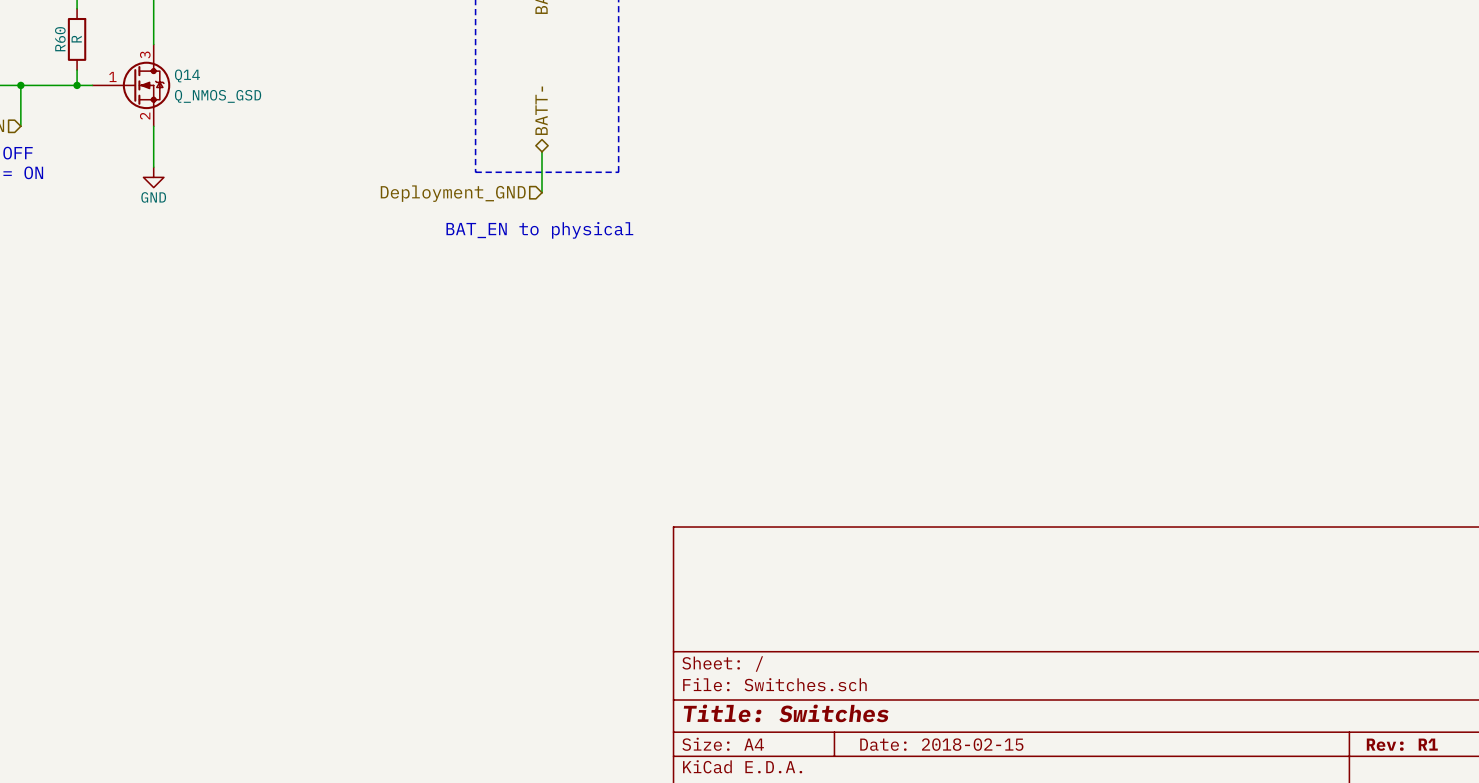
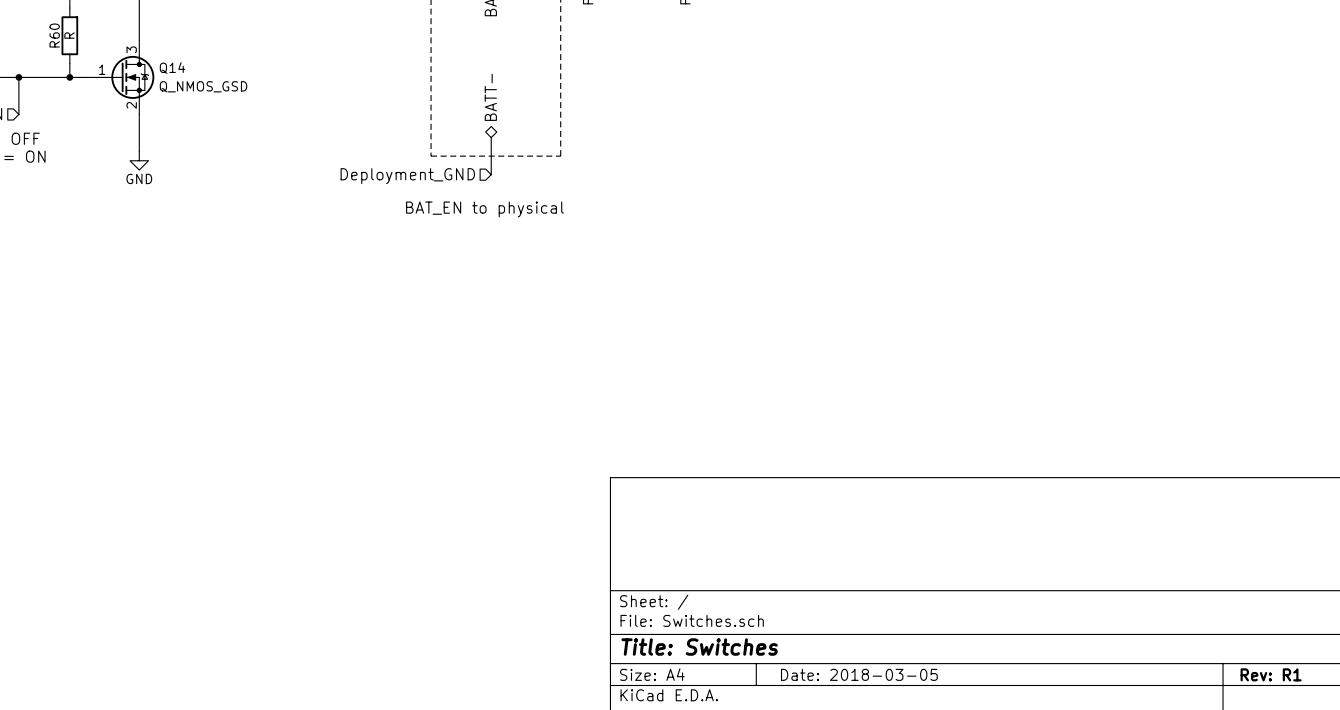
title block: Date: 2018-02-15 (941, 744) -> Date: 2018-03-05 (859, 674)

